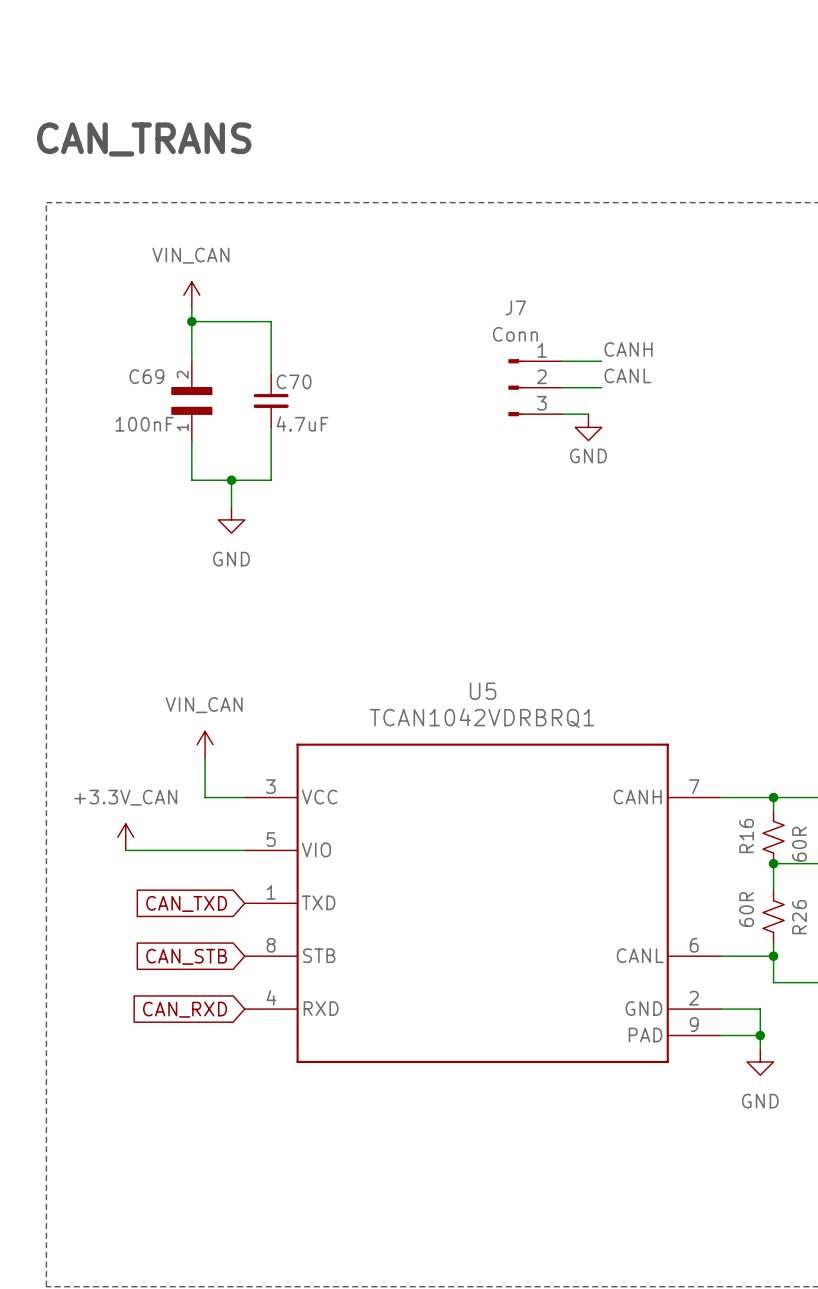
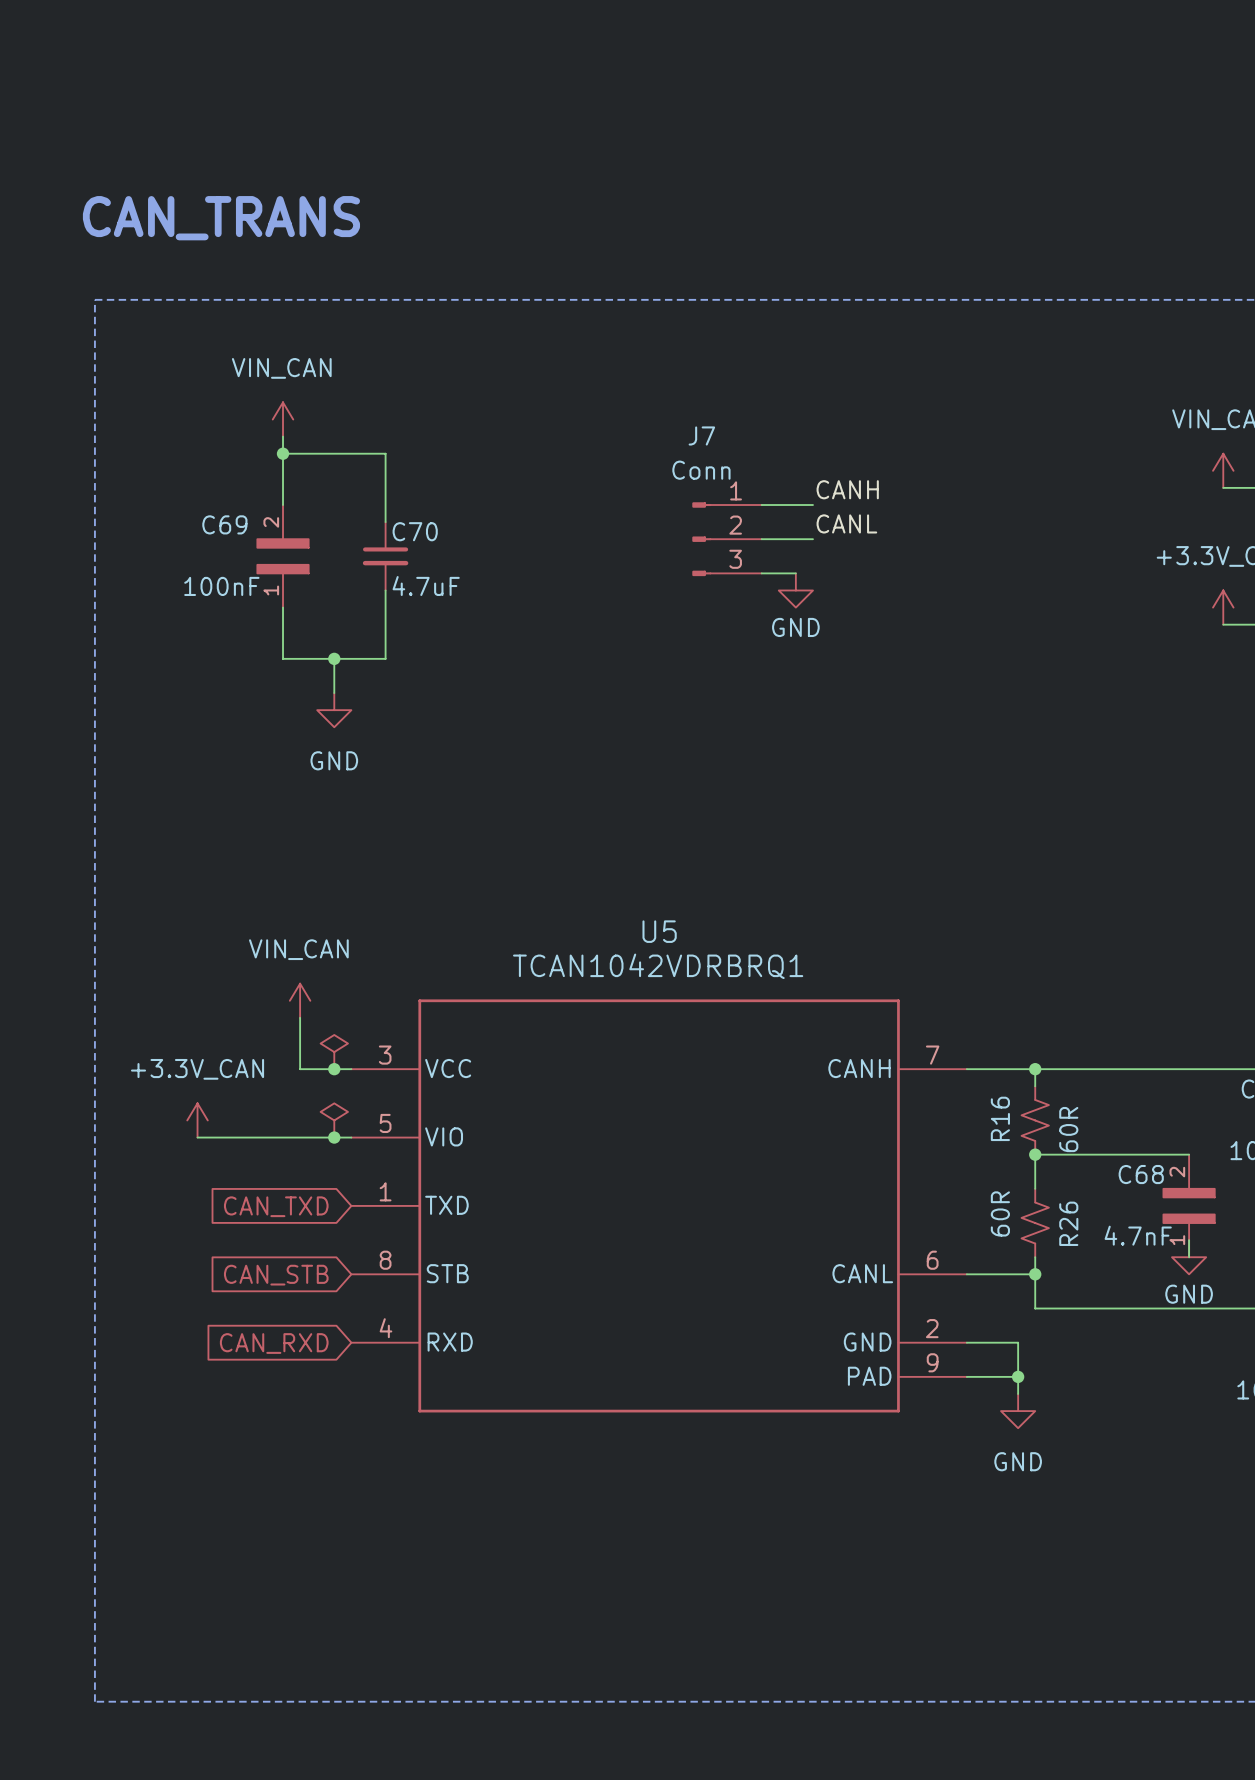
power symbol: none -> (334, 1052)
junction: none -> (334, 1069)
power symbol: none -> (334, 1120)
junction: none -> (334, 1137)

